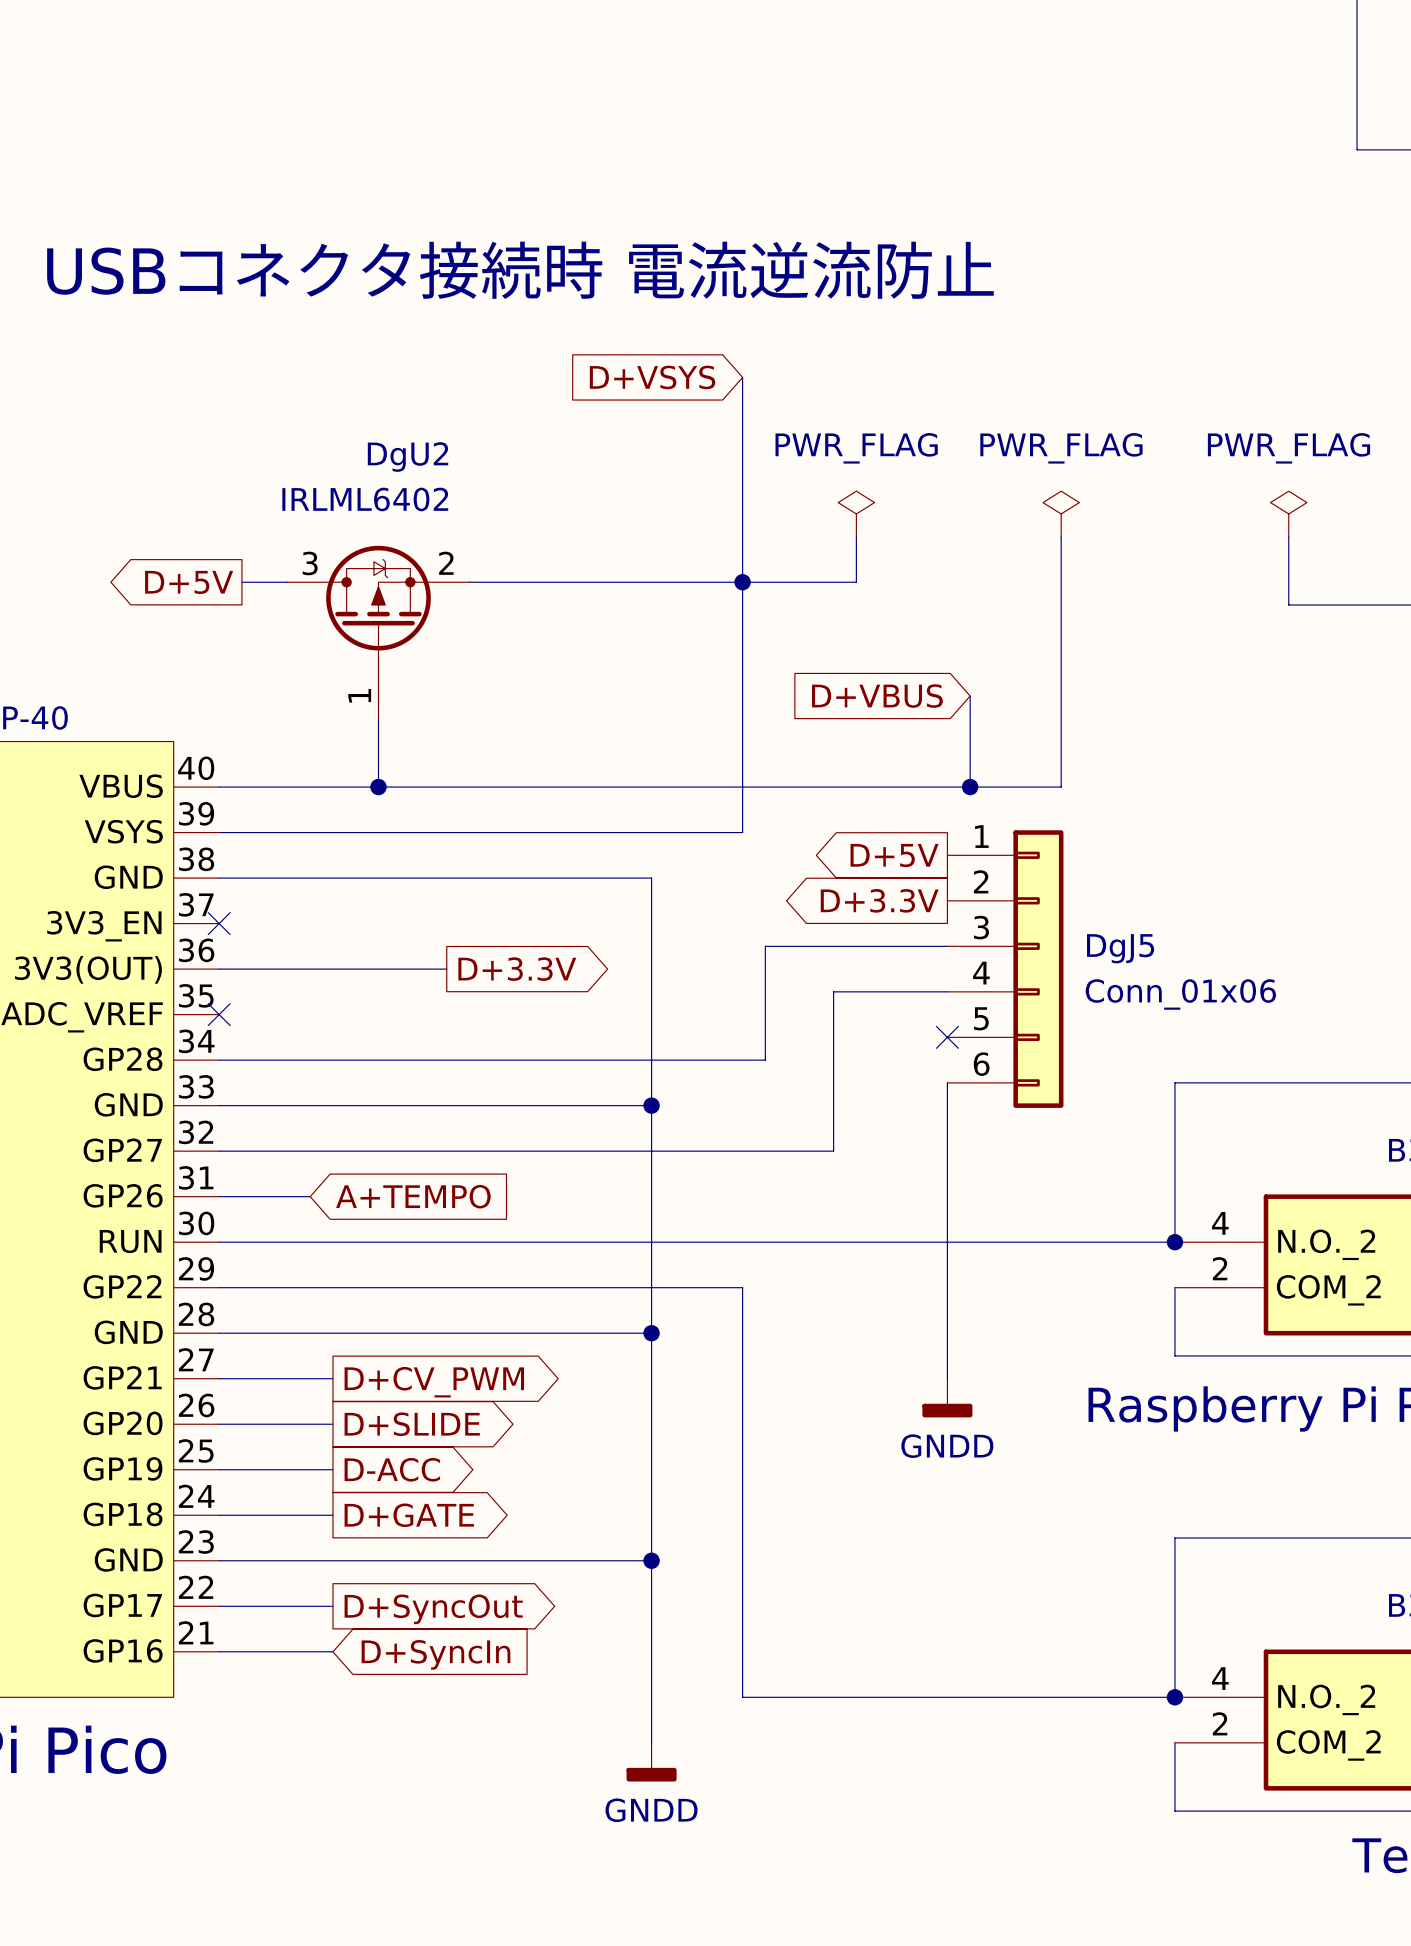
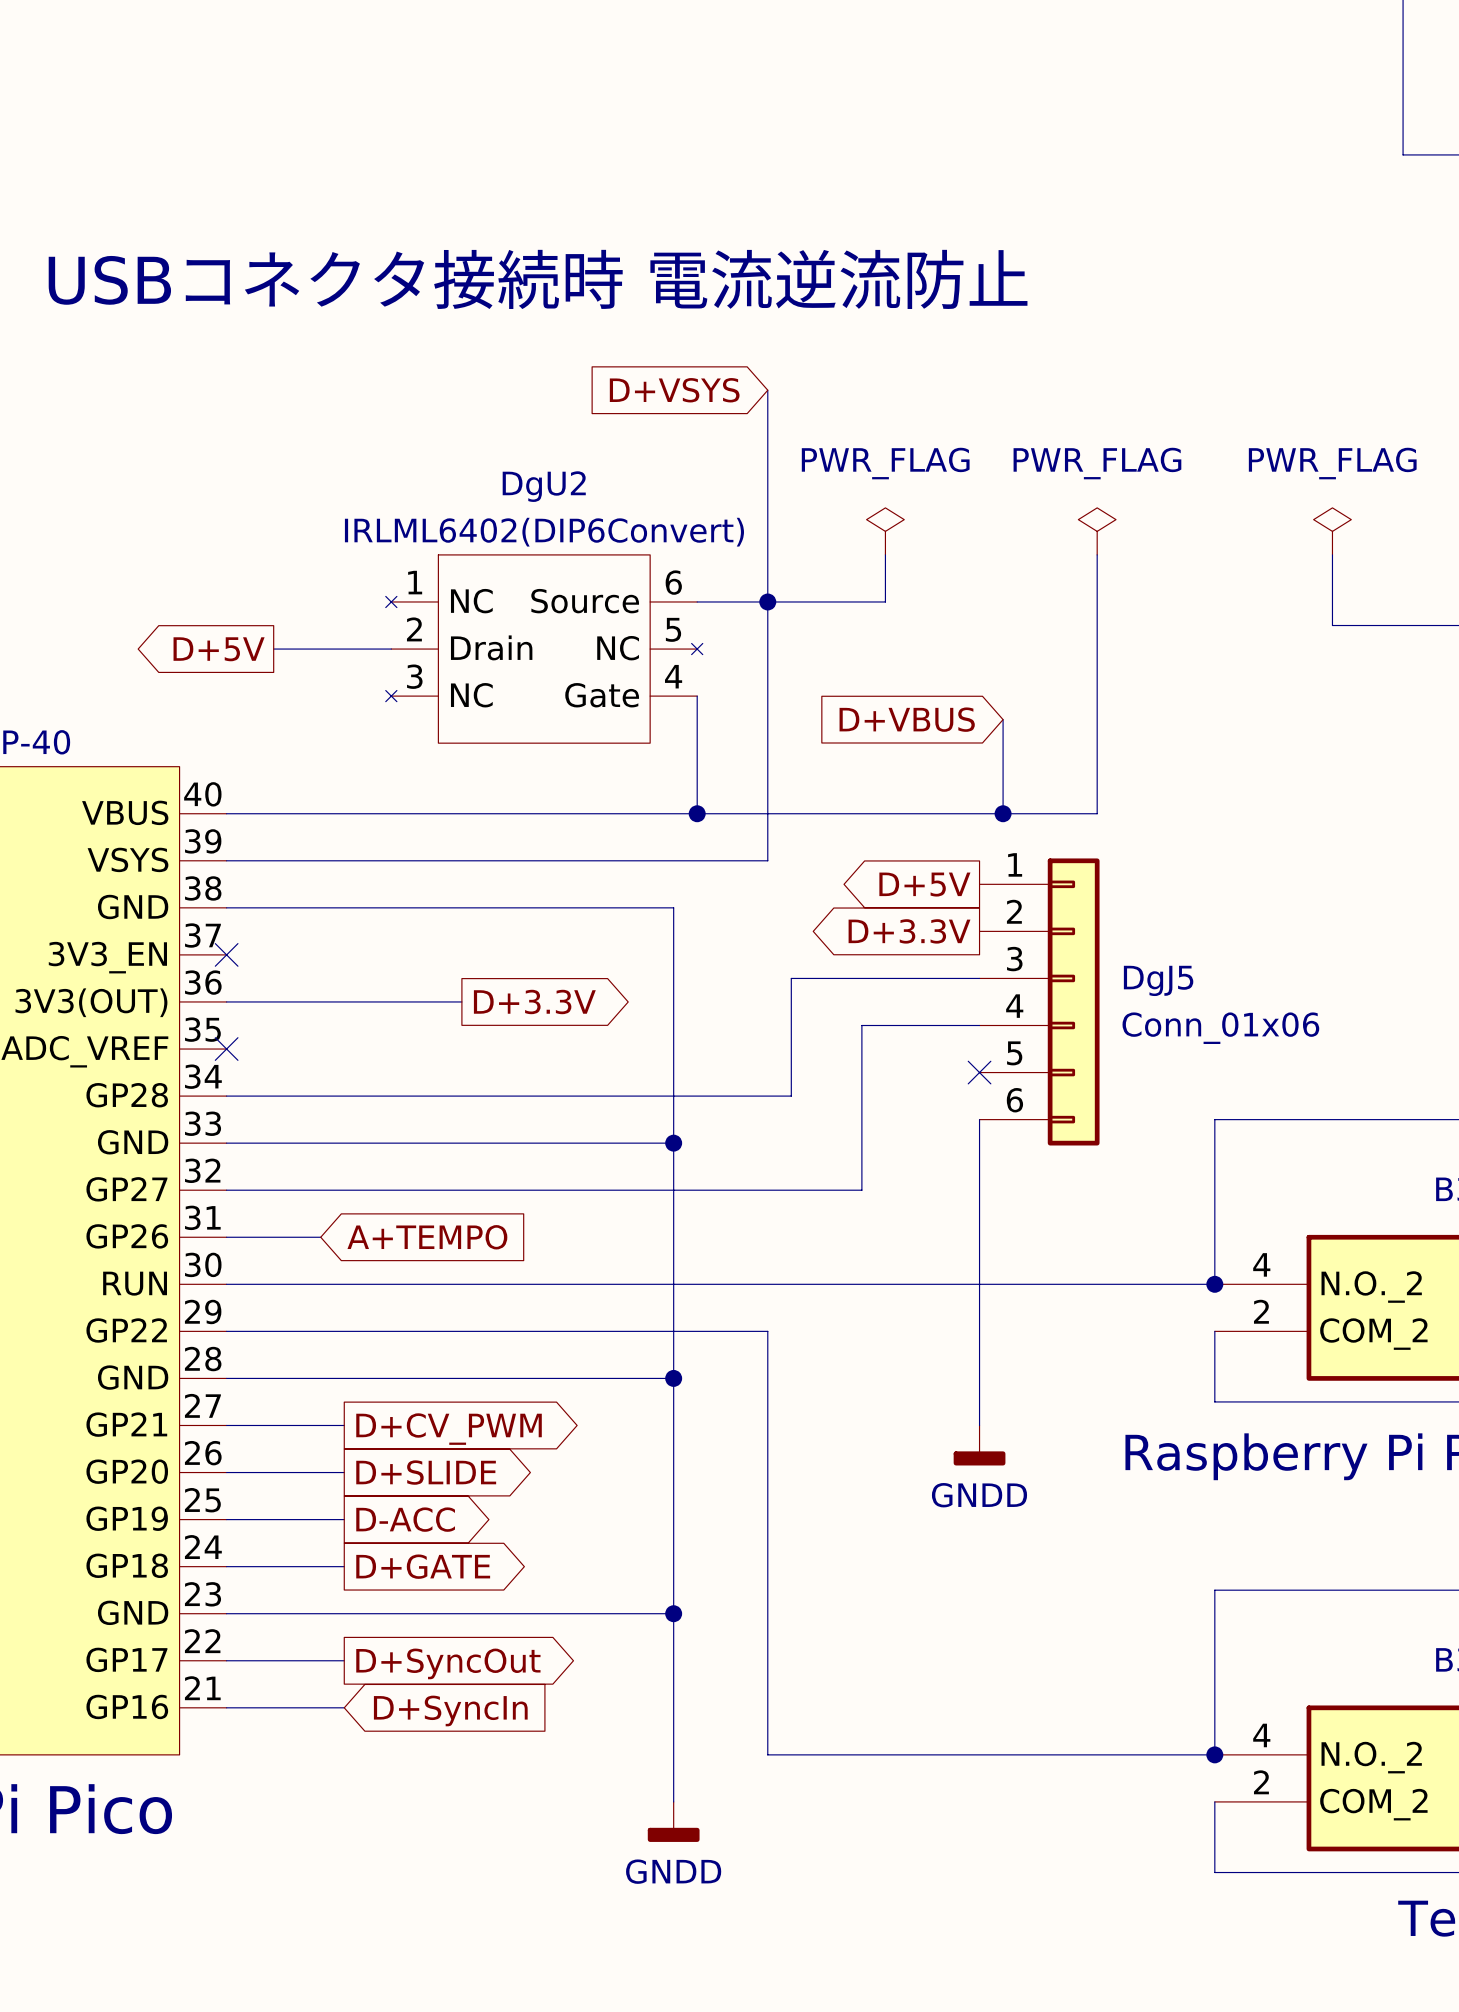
DgU2 value: IRLML6402 (365, 499) -> IRLML6402(DIP6Convert) (544, 532)
DgU2 symbol: [287, 545, 470, 719] -> [385, 554, 703, 744]
global label position: D+5V (189, 582) -> D+5V (219, 649)
wire: (241, 582) (287, 582) -> none
wire: (469, 582) (674, 582) -> none
wire: none -> (273, 649) (391, 649)
wire: none -> (697, 696) (697, 813)
wire: (378, 718) (378, 787) -> none
junction: (378, 787) -> none
junction: none -> (697, 813)

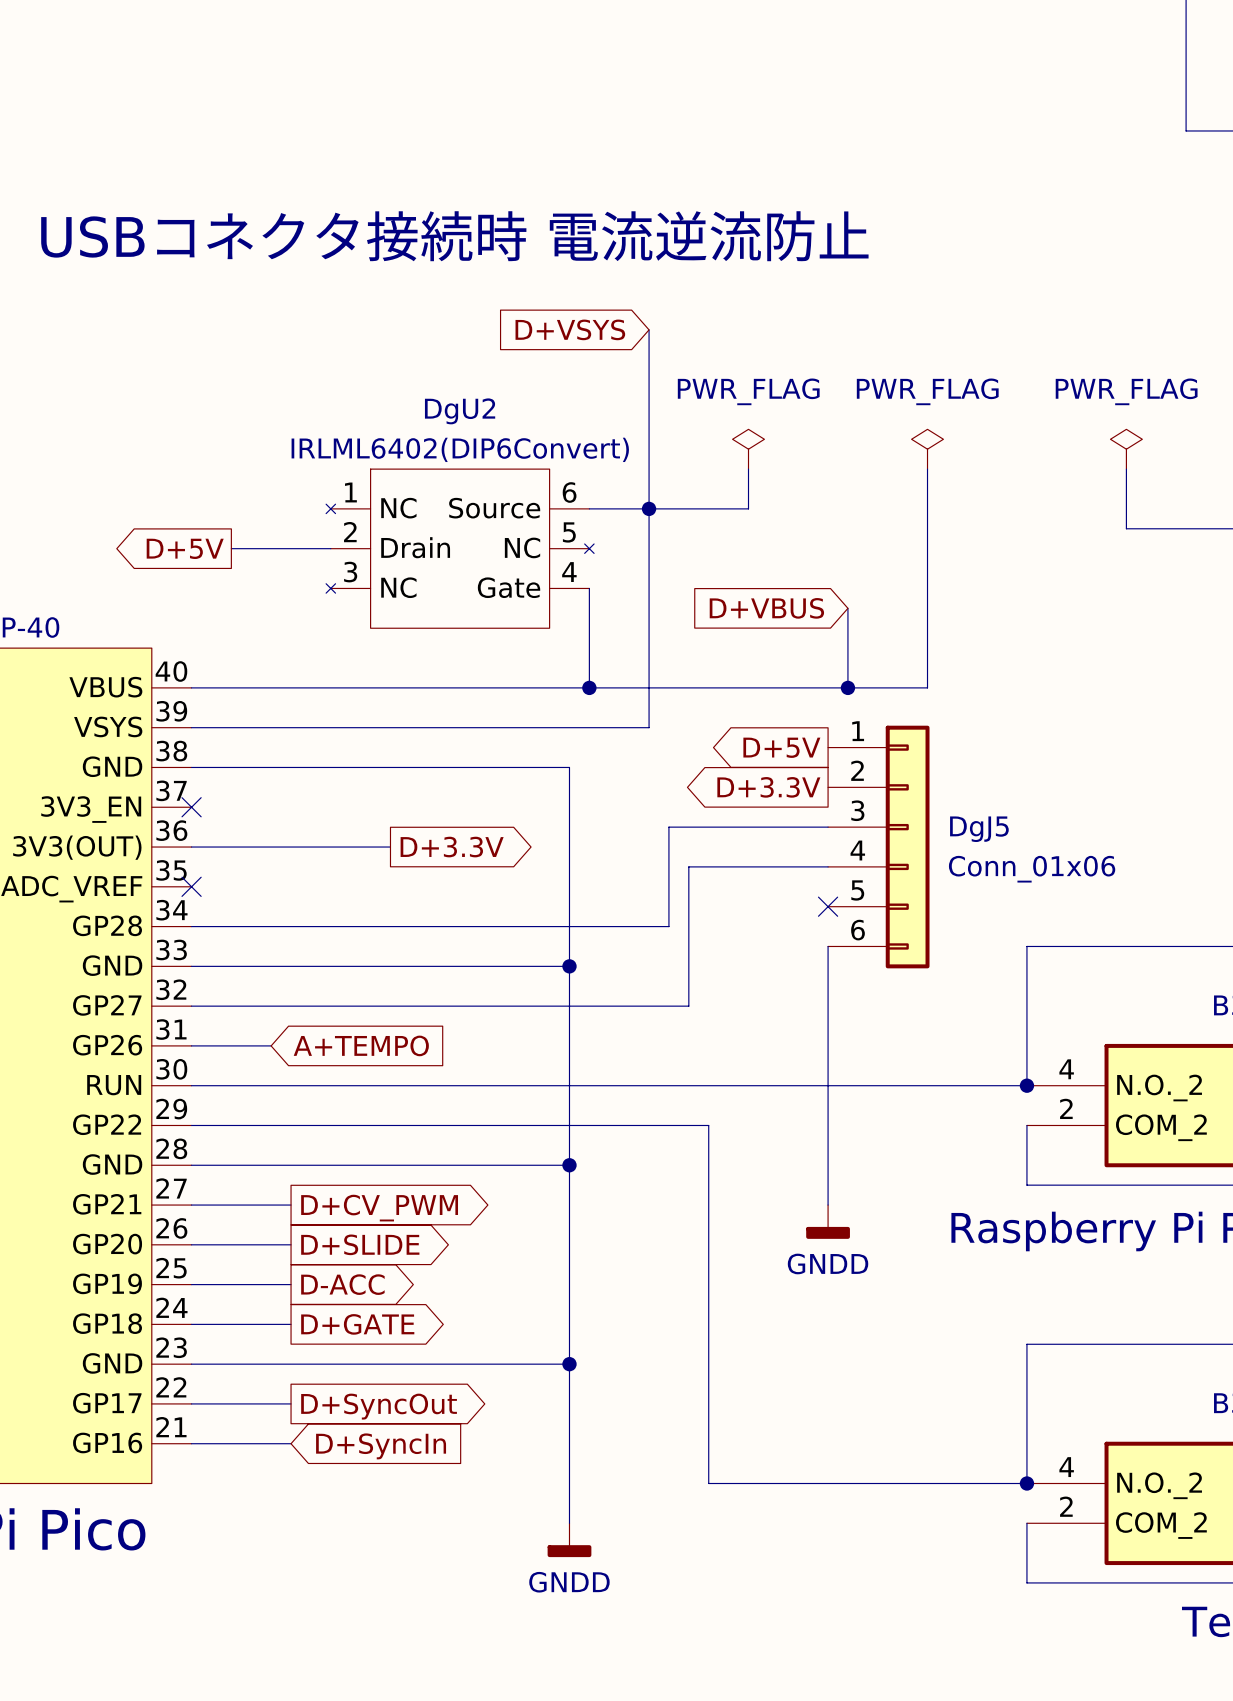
wire: (861, 1025) (861, 1190) (814, 1190) -> (728, 866) (688, 866) (688, 1006)
wire: (767, 1331) (767, 1754) (838, 1754) -> (649, 1125) (708, 1125) (708, 1483)

